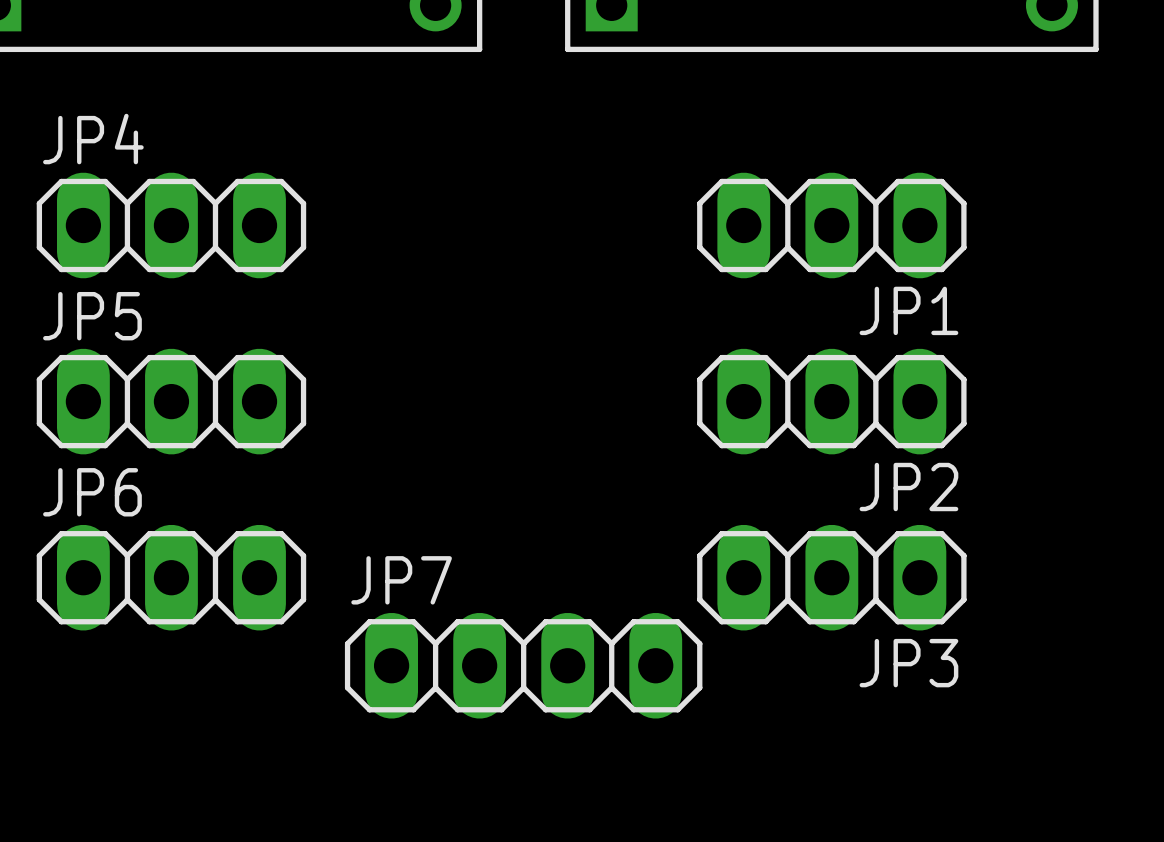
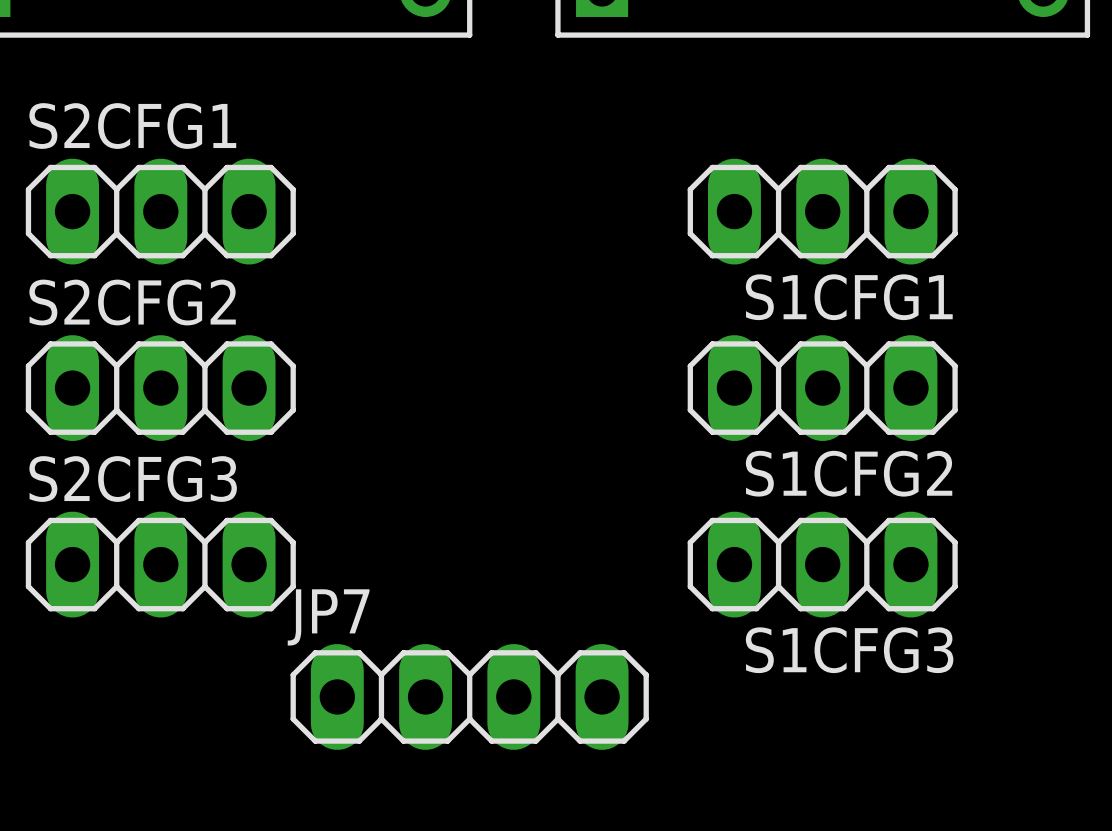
JP4 name: JP4 (93, 139) -> S2CFG1 (132, 126)
JP1 name: JP1 (908, 310) -> S1CFG1 (849, 297)
JP5 name: JP5 (92, 316) -> S2CFG2 (132, 302)
JP2 name: JP2 (908, 487) -> S1CFG2 (849, 473)
JP6 name: JP6 (92, 492) -> S2CFG3 (133, 479)
JP3 name: JP3 (908, 663) -> S1CFG3 (849, 650)
JP7 position: (523, 665) -> (469, 696)

